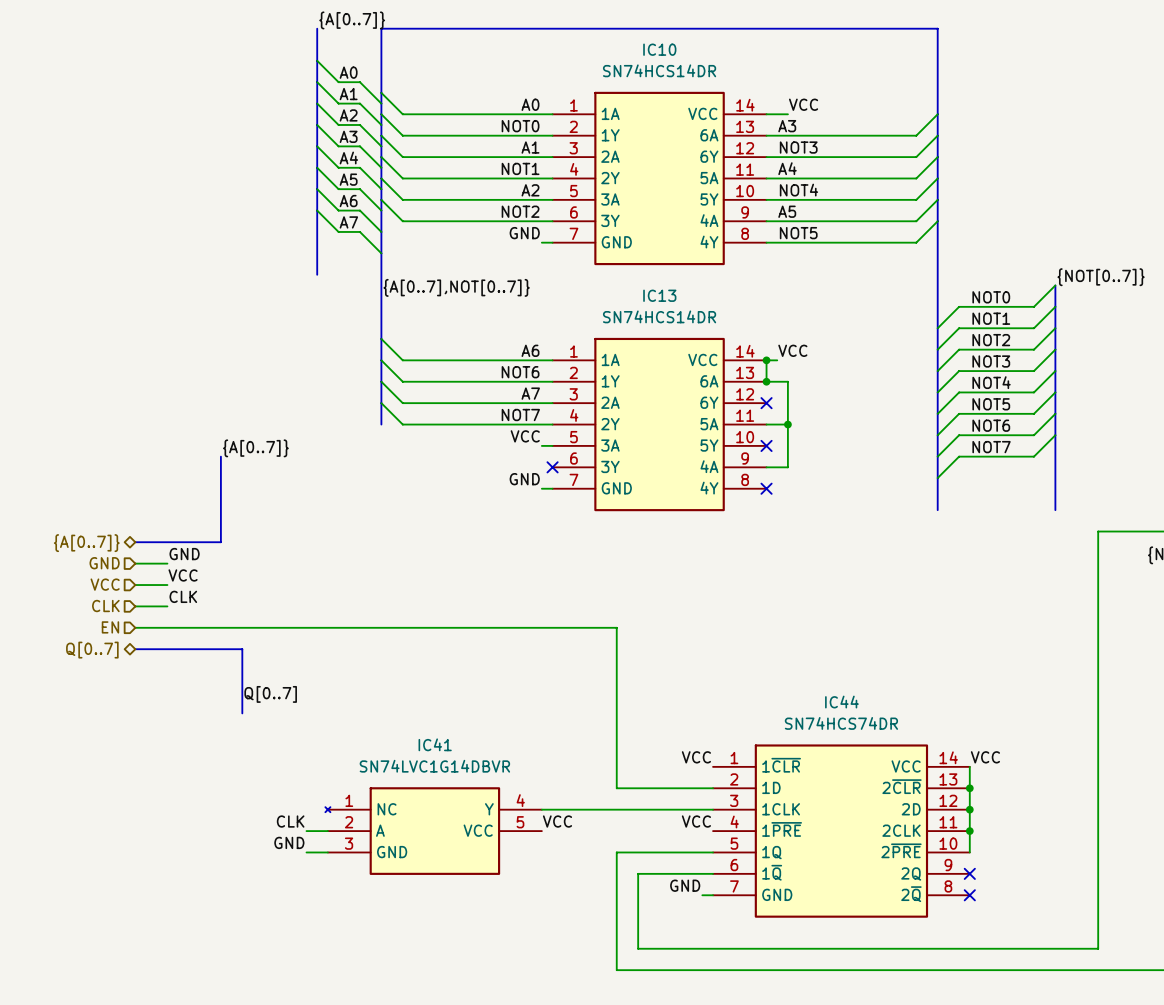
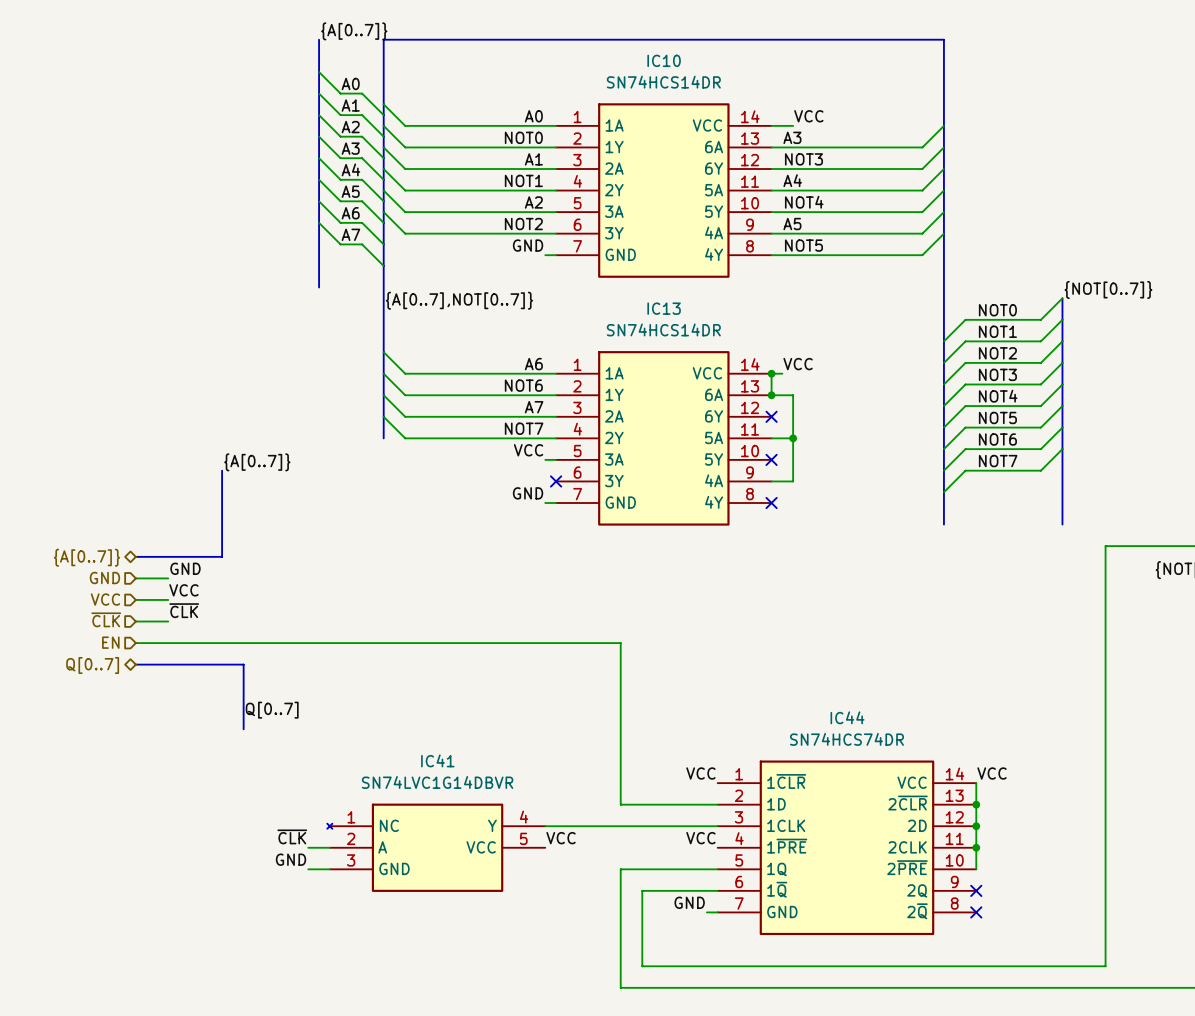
label: CLK (183, 596) -> ~{CLK} (184, 610)
hierarchical label: CLK (105, 606) -> ~{CLK} (106, 619)
label: CLK (290, 821) -> ~{CLK} (292, 836)

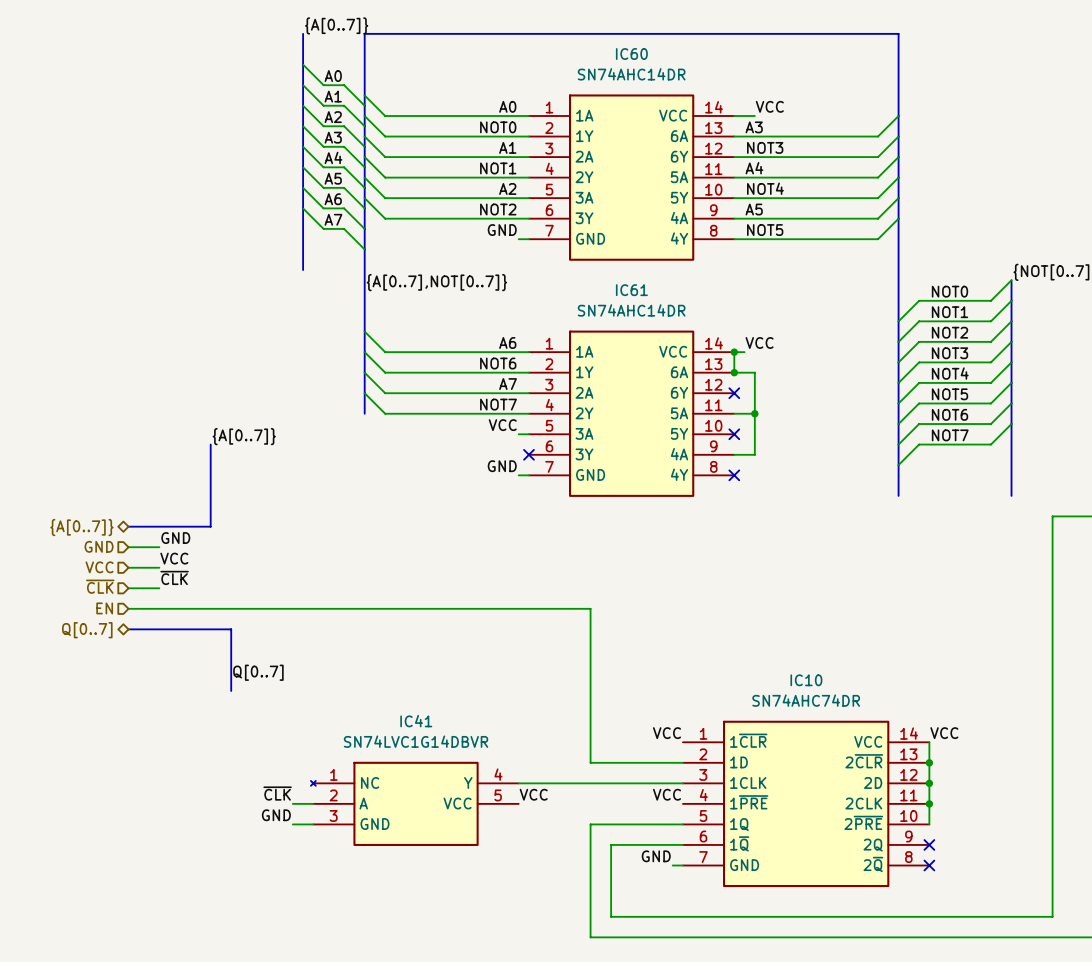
IC10 name: IC10 (664, 60) -> IC60 (631, 54)
IC10 value: SN74HCS14DR (663, 82) -> SN74AHC14DR (631, 74)
IC13 name: IC13 (664, 308) -> IC61 (631, 290)
IC13 value: SN74HCS14DR (663, 329) -> SN74AHC14DR (631, 310)
IC44 name: IC44 (847, 717) -> IC10 (806, 680)
IC44 value: SN74HCS74DR (846, 739) -> SN74AHC74DR (806, 700)

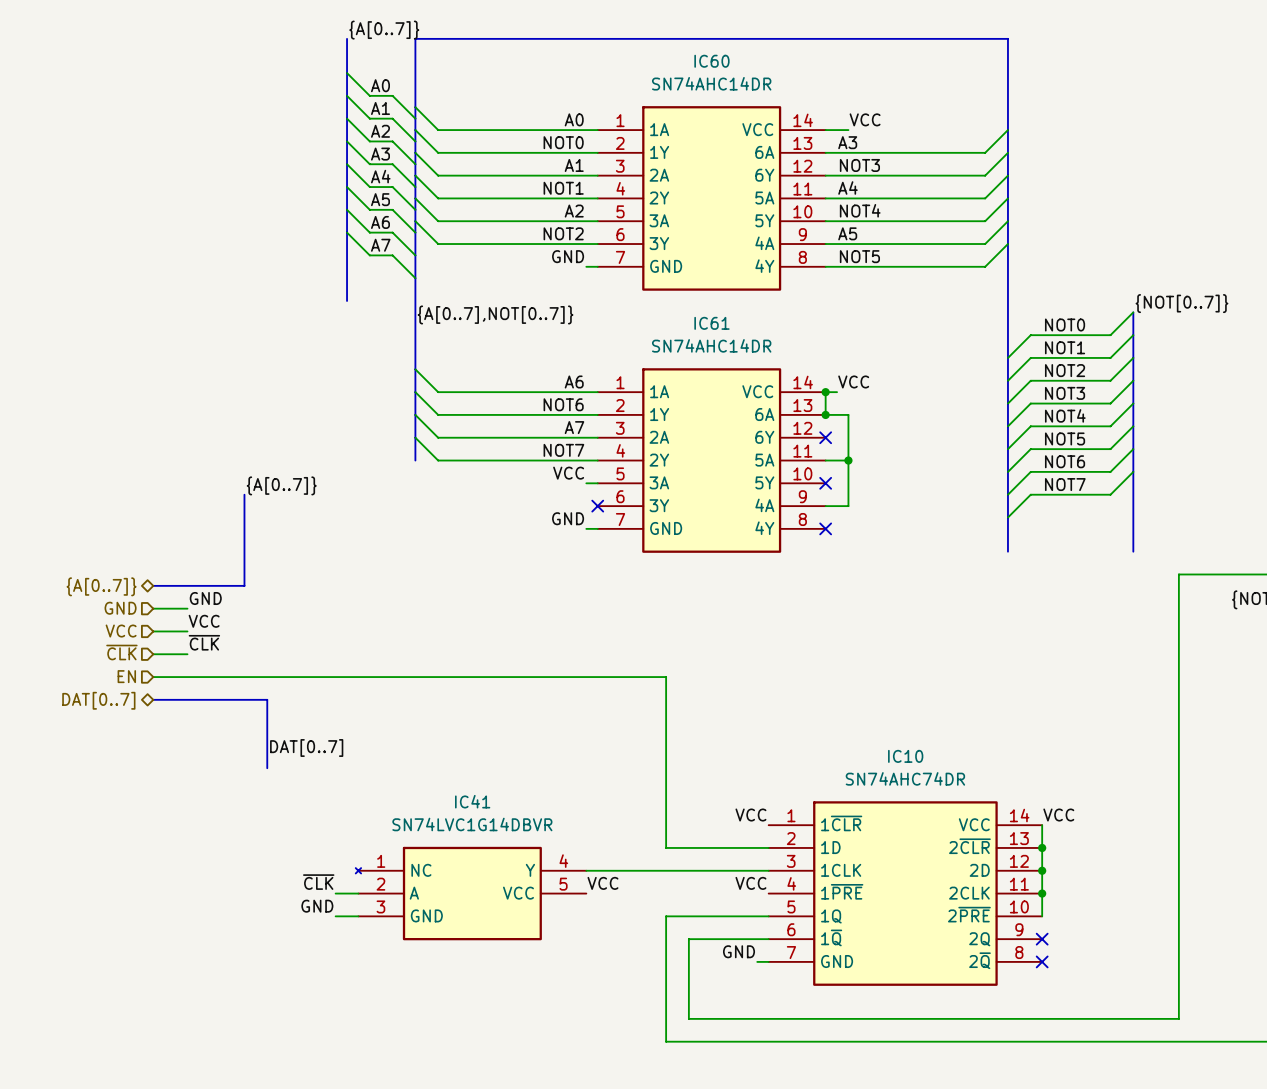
hierarchical label: Q[0..7] (87, 630) -> DAT[0..7] (98, 700)
label: Q[0..7] (258, 672) -> DAT[0..7] (306, 748)

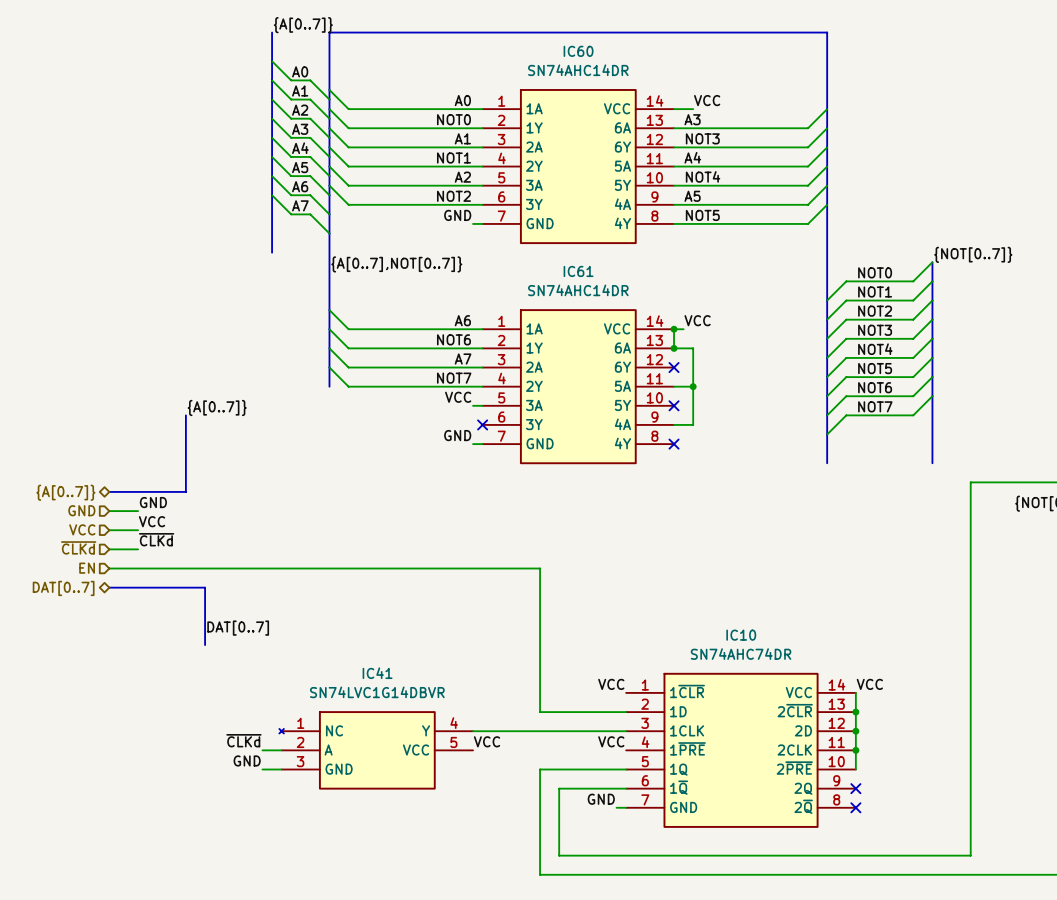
label: ~{CLK} (204, 642) -> ~{CLKd} (156, 539)
hierarchical label: ~{CLK} (121, 652) -> ~{CLKd} (78, 547)
label: ~{CLK} (318, 882) -> ~{CLKd} (243, 740)

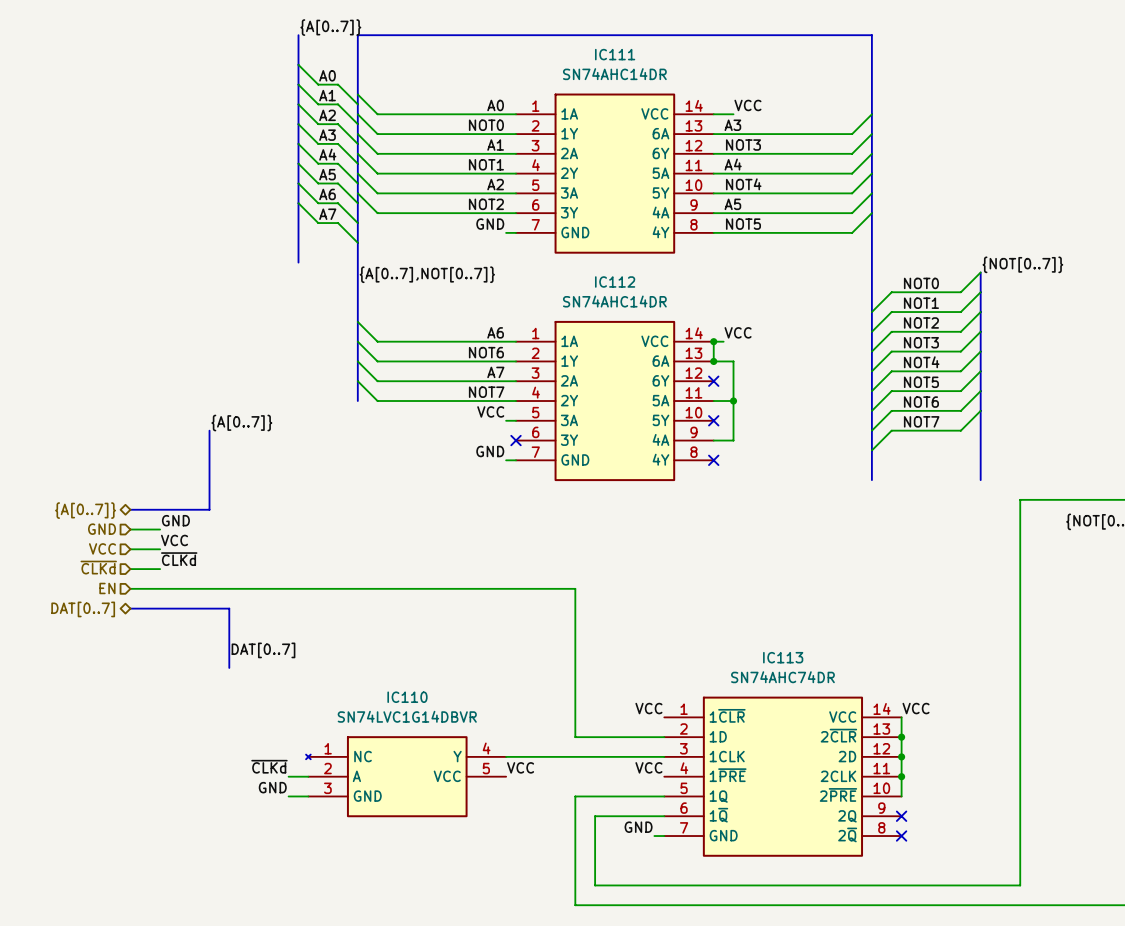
IC60 name: IC60 (578, 51) -> IC111 (615, 54)
IC61 name: IC61 (578, 271) -> IC112 (615, 281)
IC10 name: IC10 (741, 635) -> IC113 (783, 657)
IC41 name: IC41 (377, 673) -> IC110 (407, 697)

